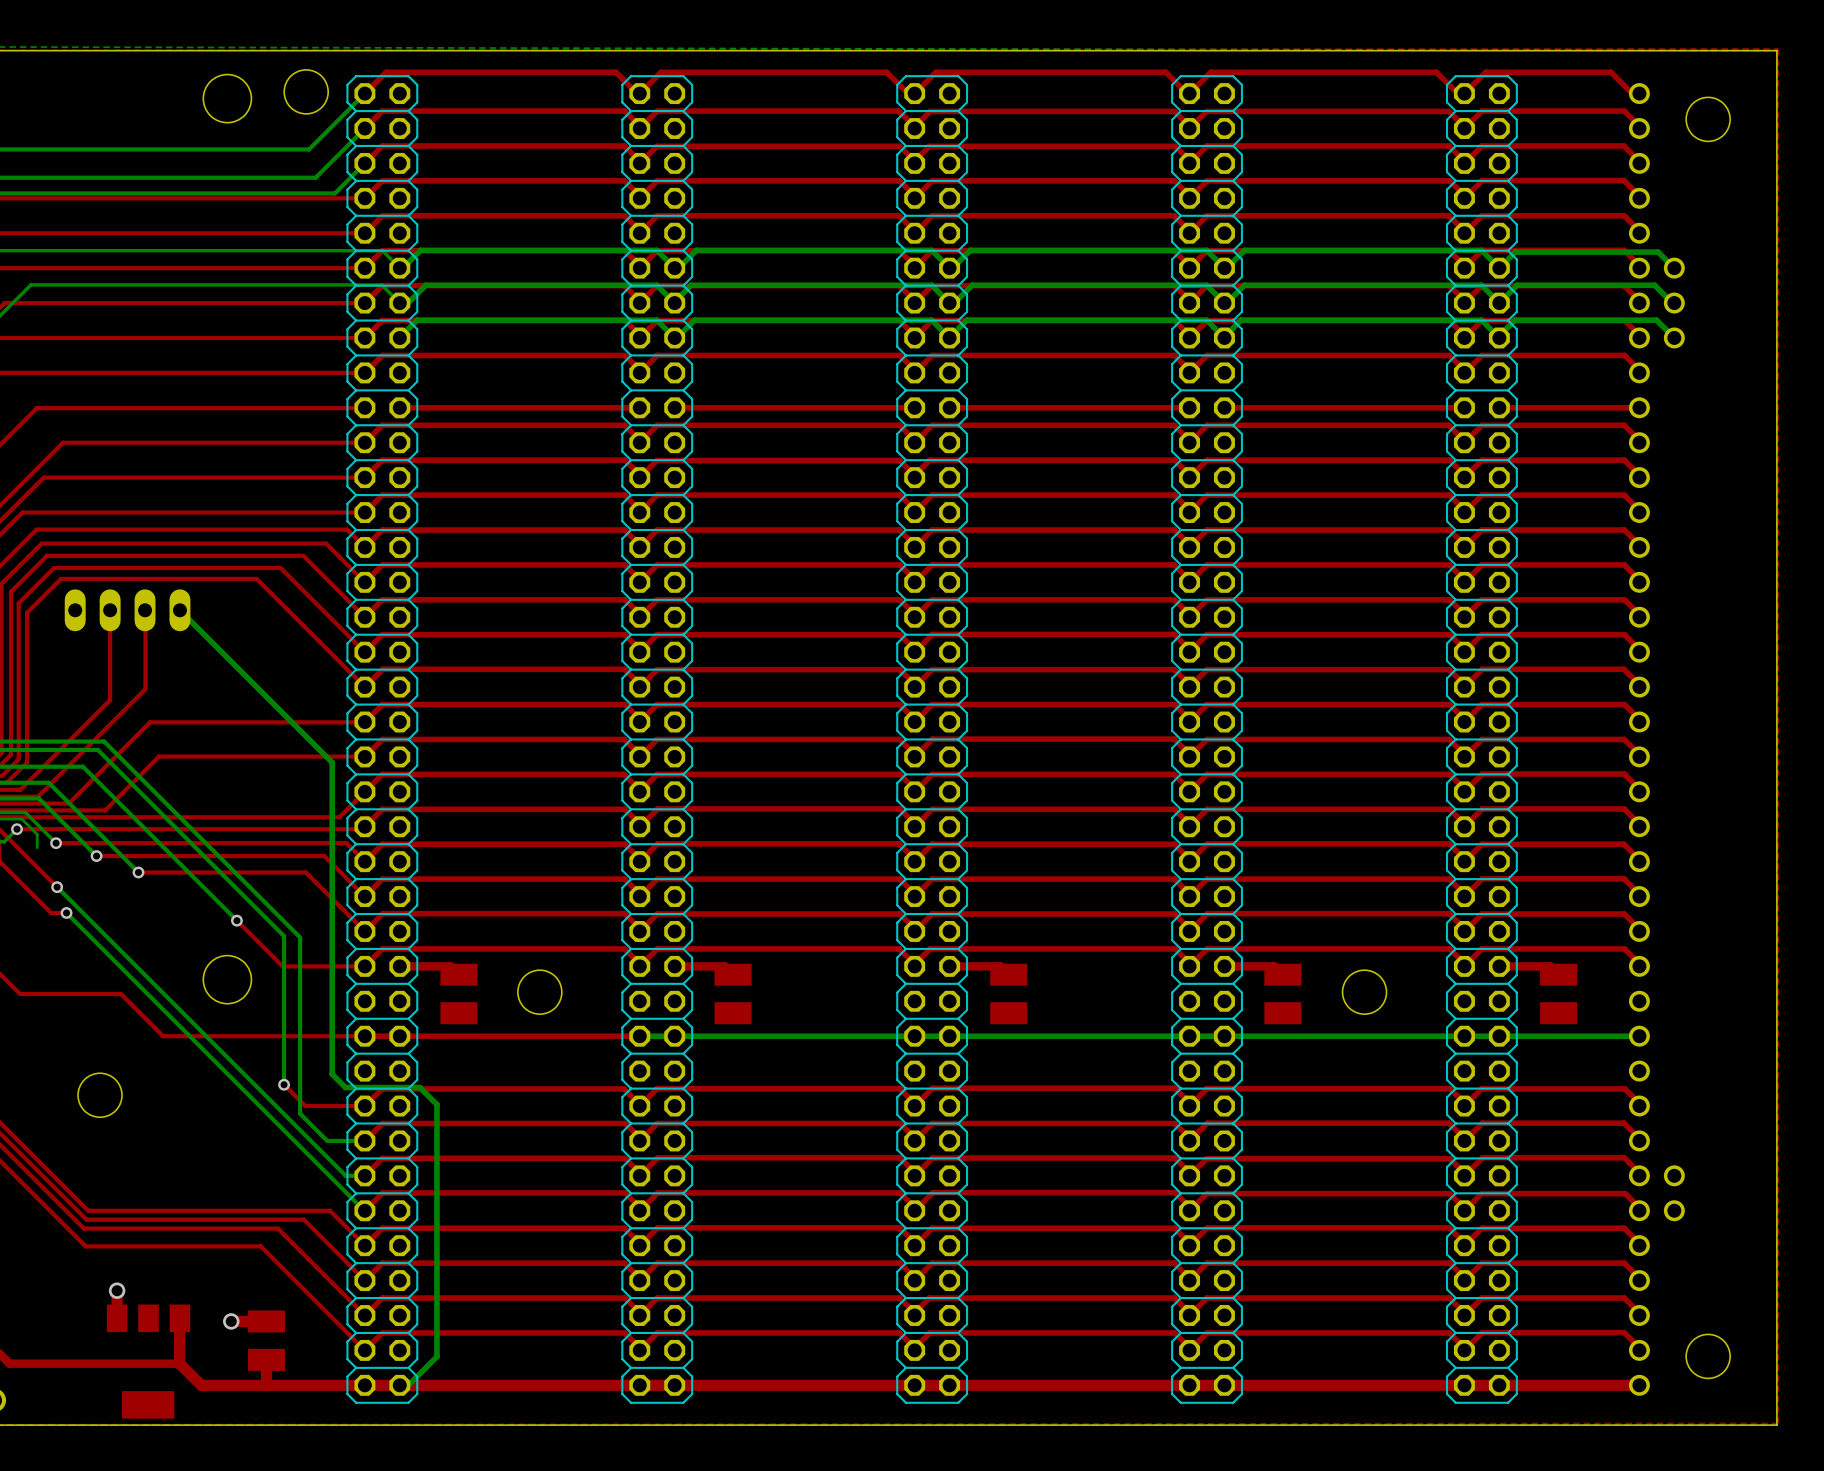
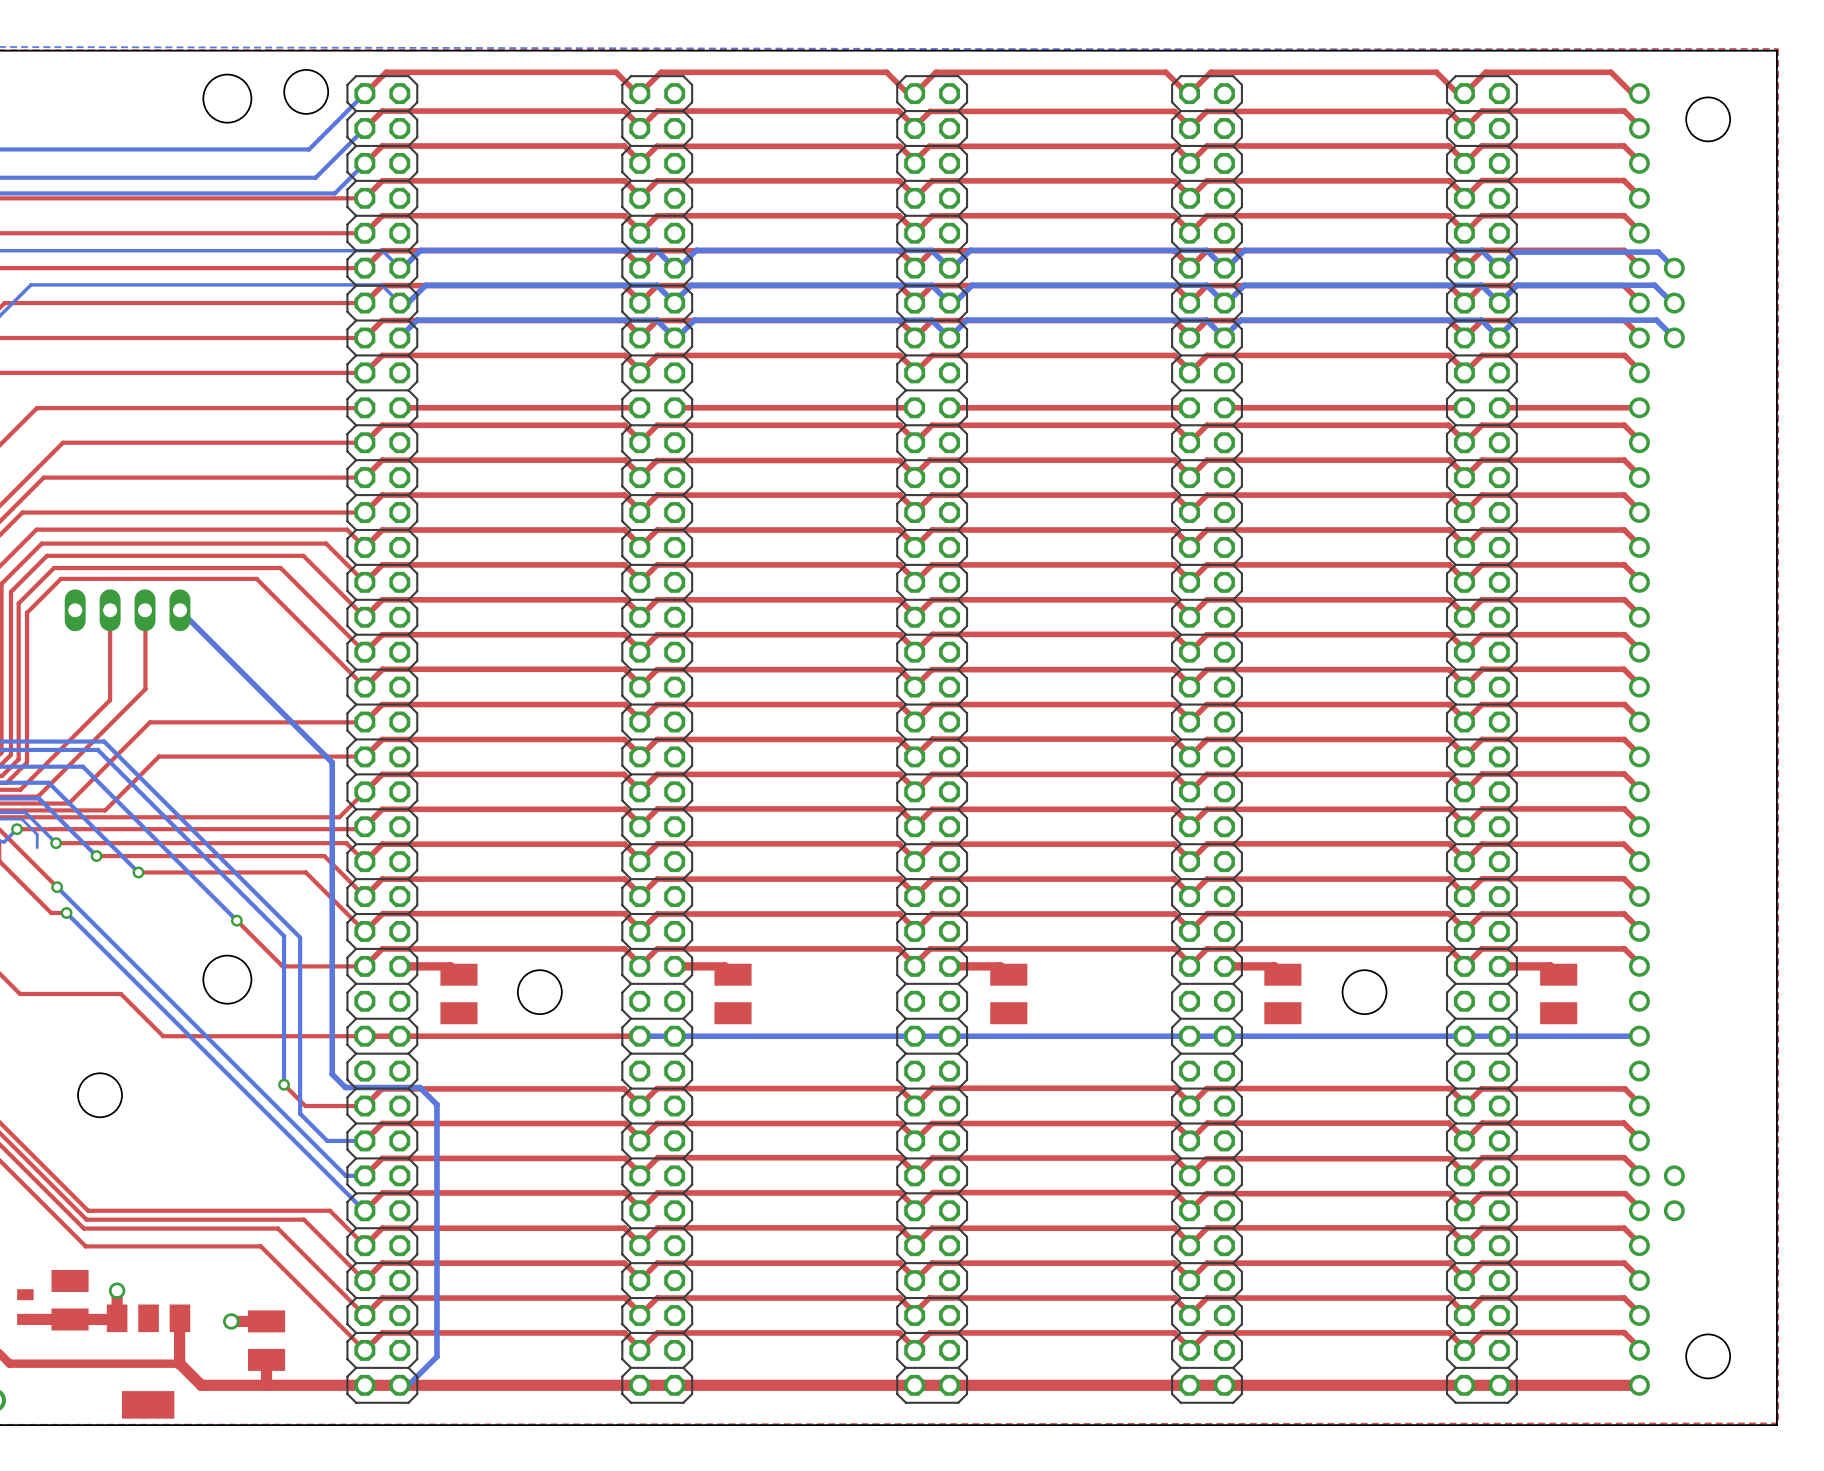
part: none -> (70, 1300)
part: none -> (25, 1307)

